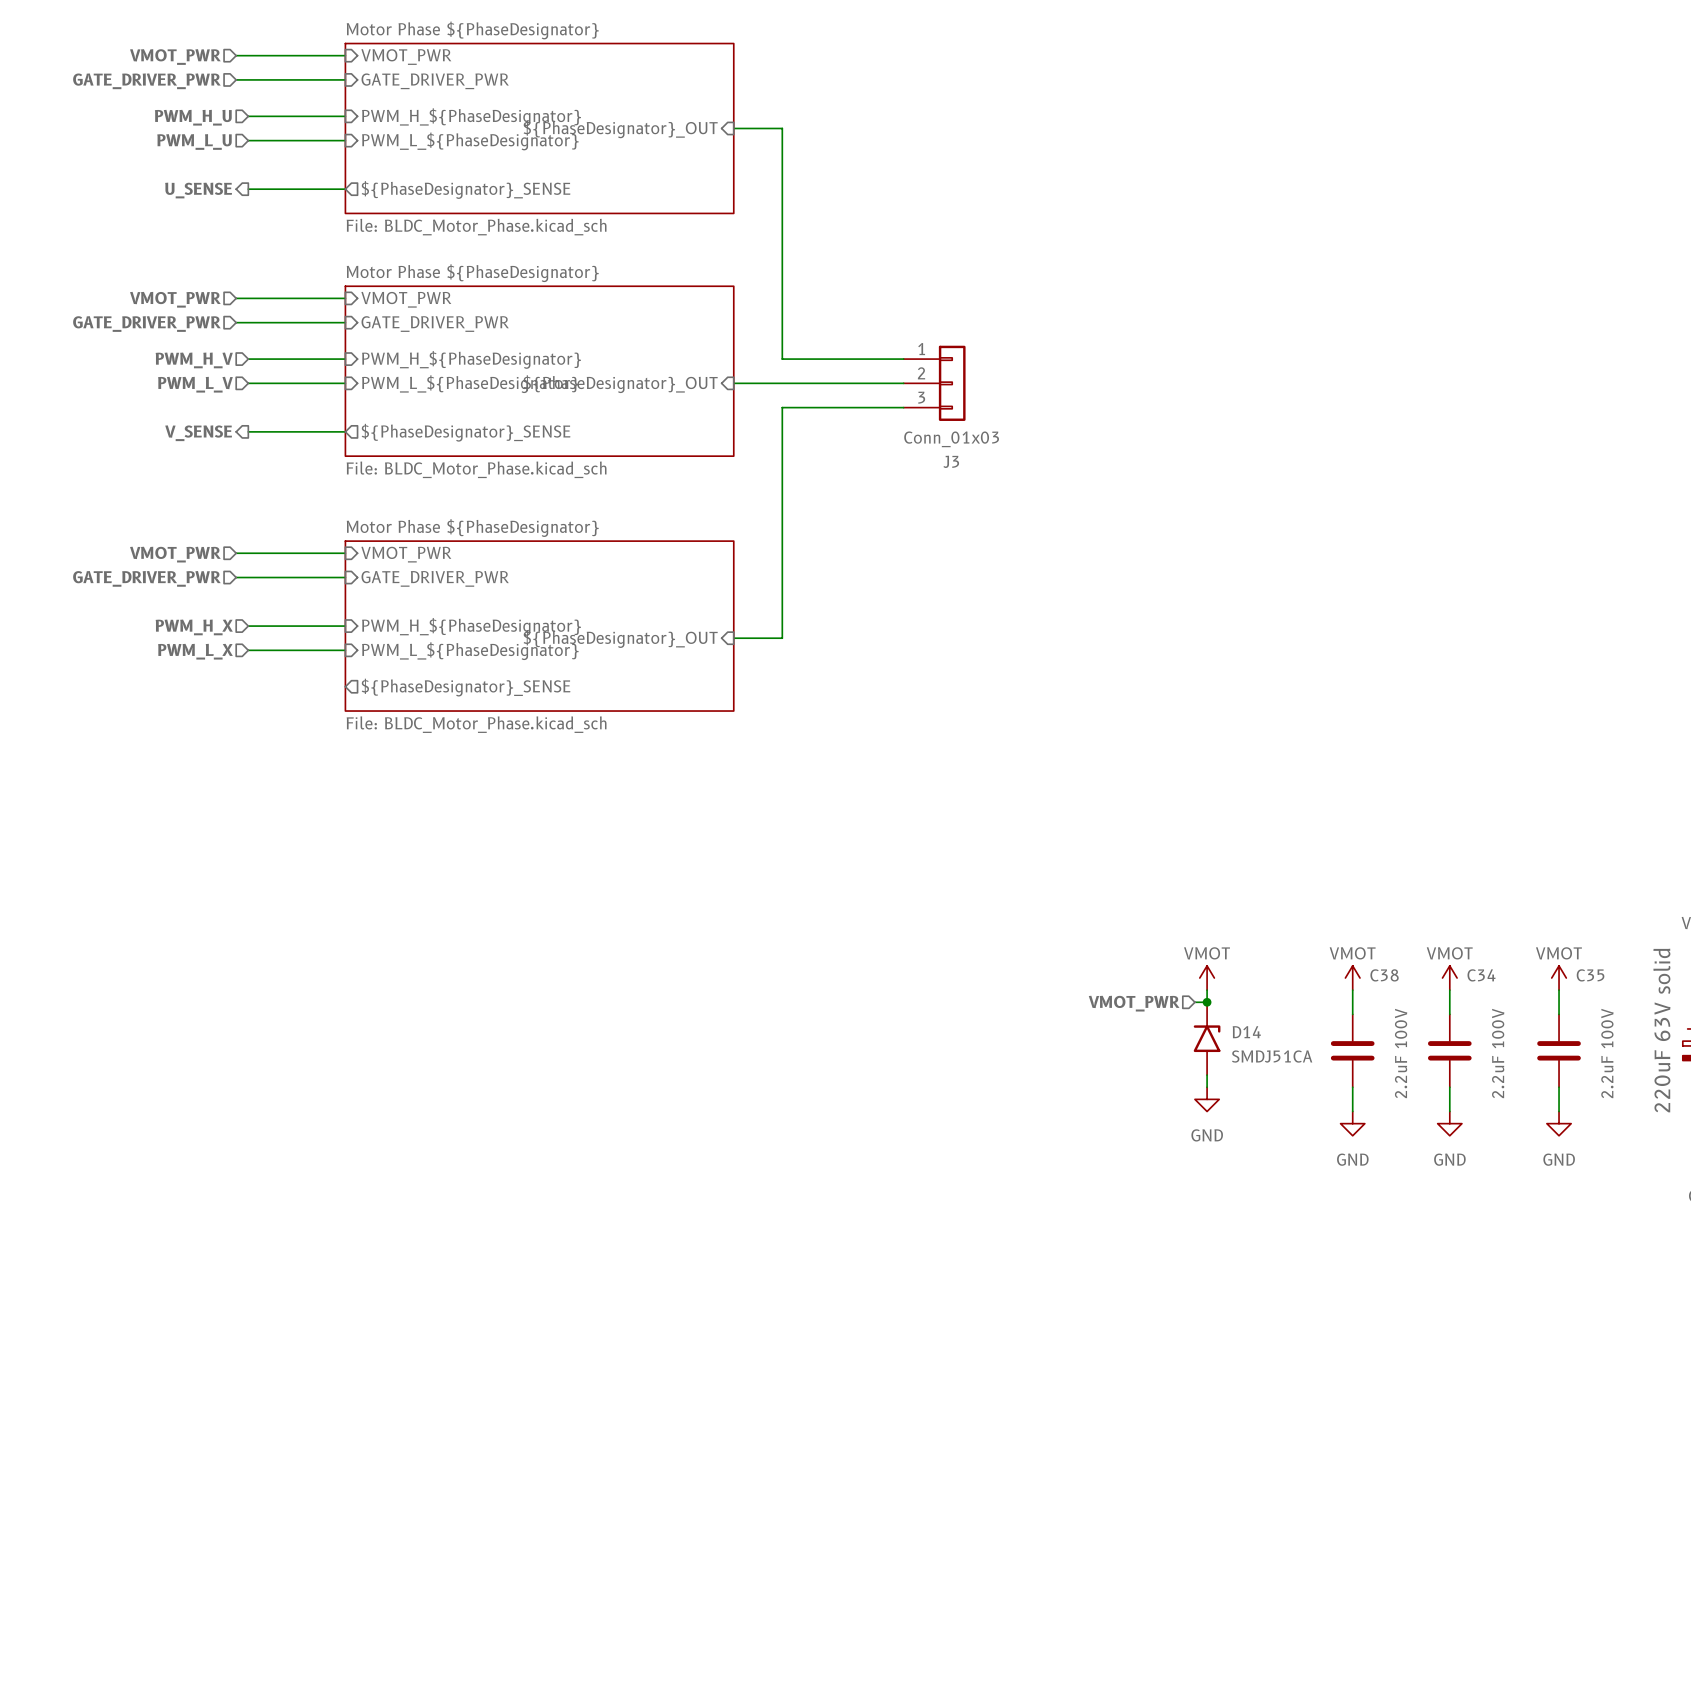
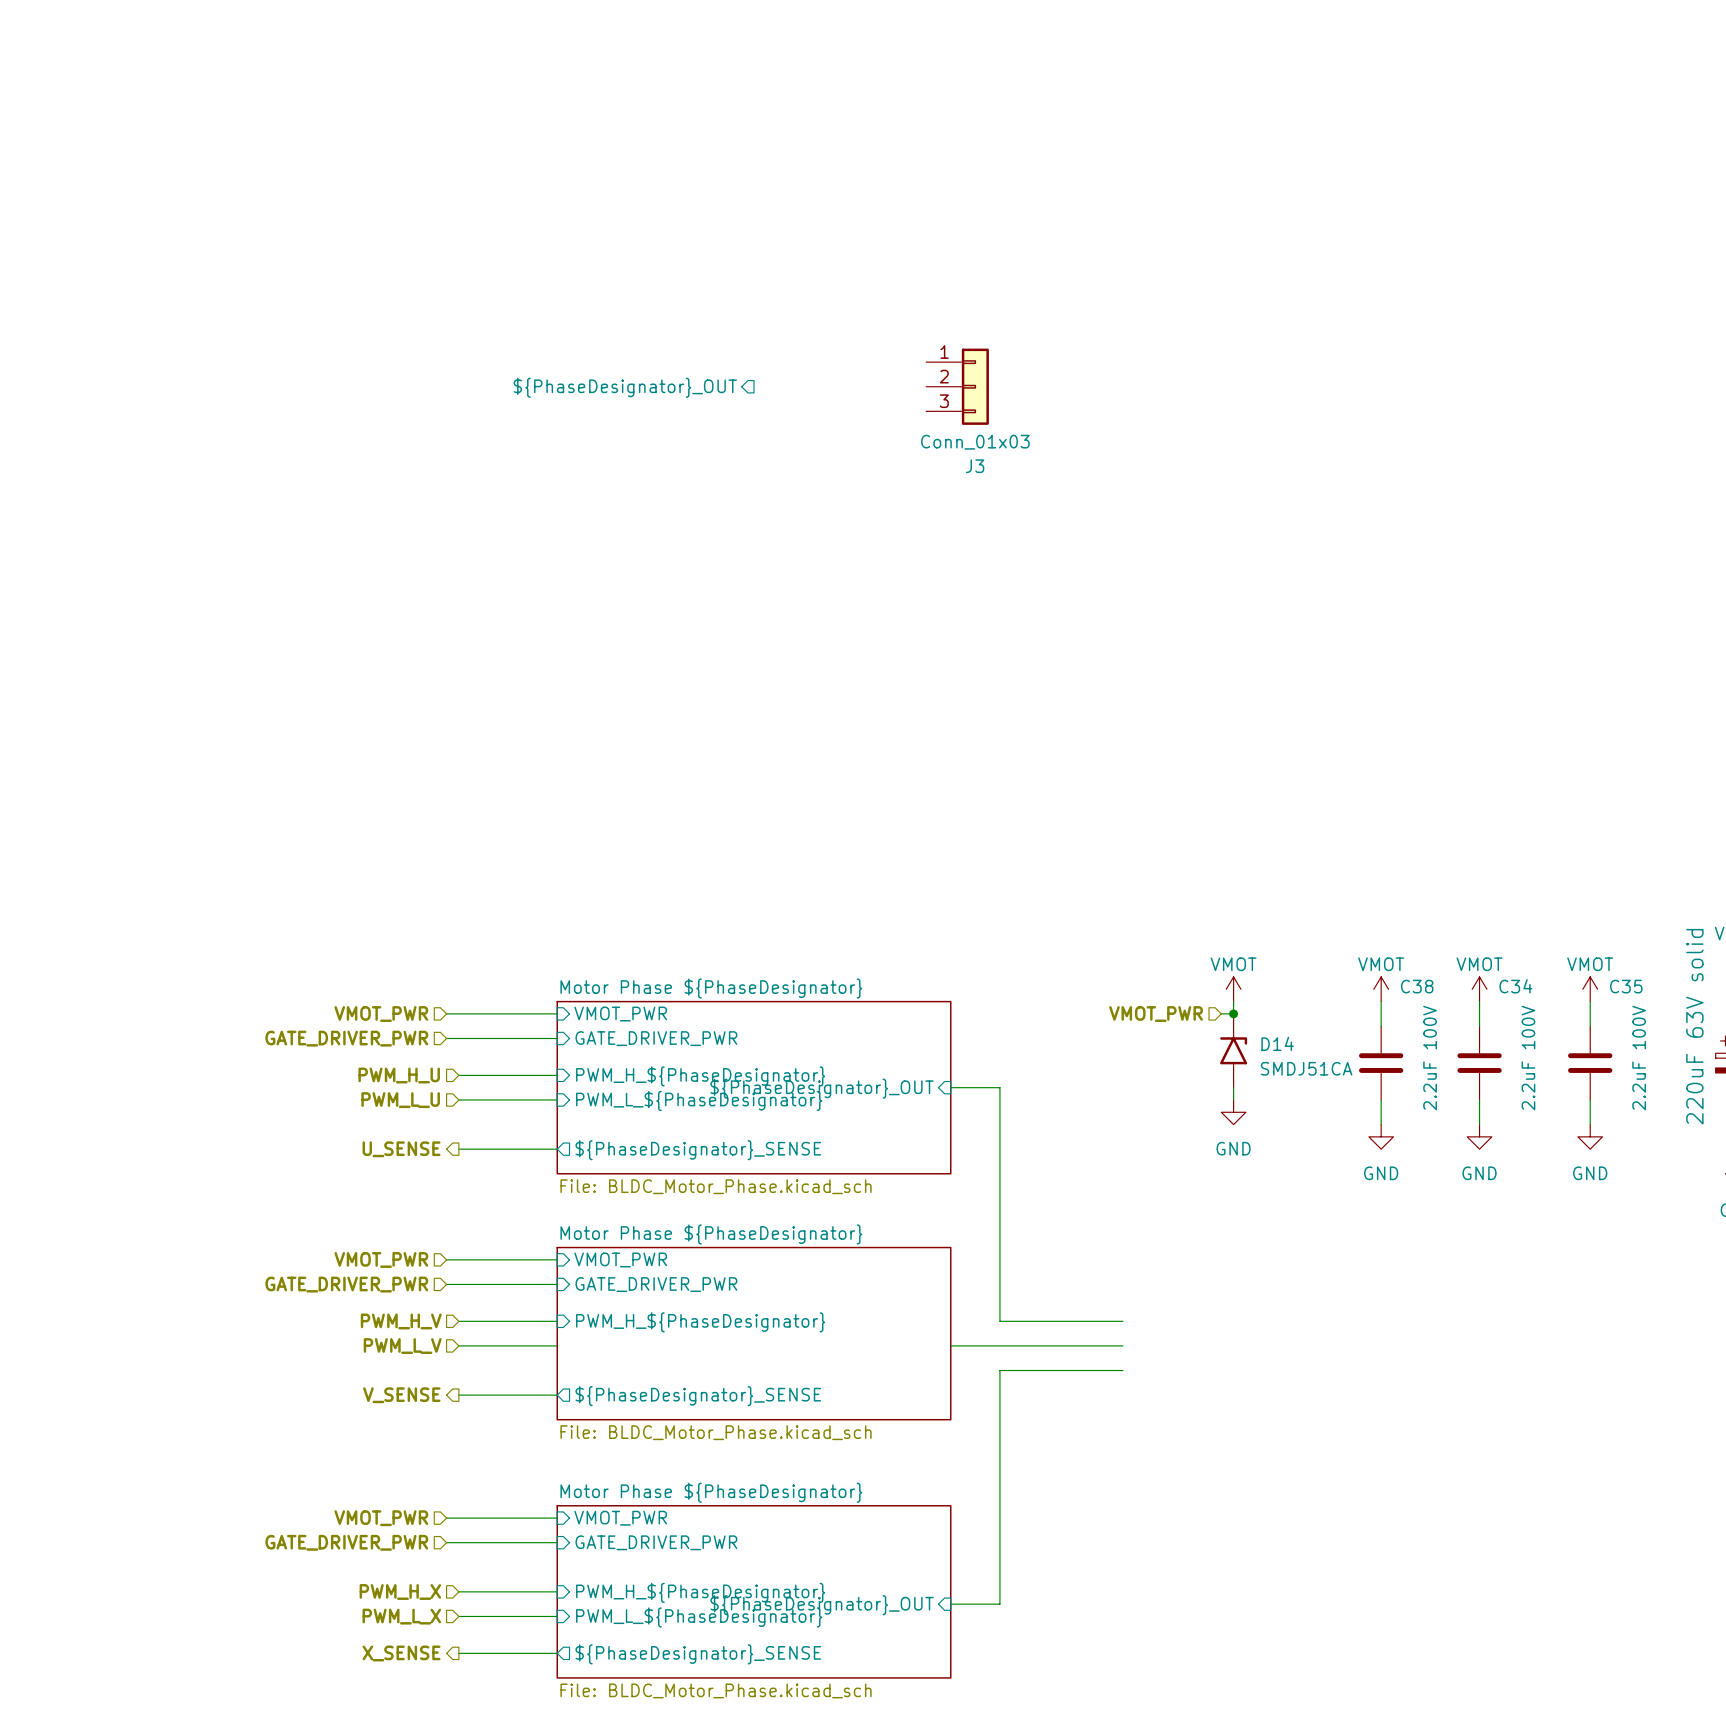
wire: (236, 55) (345, 55) -> none
hierarchical label: VMOT_PWR (175, 57) -> none
sheet pin: VMOT_PWR (406, 57) -> none
wire: (236, 79) (345, 79) -> none
hierarchical label: GATE_DRIVER_PWR (146, 81) -> none
sheet pin: GATE_DRIVER_PWR (435, 81) -> none
wire: (248, 116) (345, 116) -> none
hierarchical label: PWM_H_U (193, 117) -> none
sheet pin: PWM_H_${PhaseDesignator} (471, 117) -> none
sheet Motor Phase ${PhaseDesignator}: File: BLDC_Motor_Phase.kicad_sch (539, 128) -> none
wire: (733, 128) (782, 128) (782, 359) (903, 359) -> none
sheet pin: ${PhaseDesignator}_OUT (620, 129) -> none
wire: (248, 140) (345, 140) -> none
hierarchical label: PWM_L_U (194, 141) -> none
sheet pin: PWM_L_${PhaseDesignator} (470, 141) -> none
wire: (248, 189) (345, 189) -> none
sheet pin: ${PhaseDesignator}_SENSE (466, 189) -> none
hierarchical label: U_SENSE (198, 190) -> none
wire: (236, 298) (345, 298) -> none
hierarchical label: VMOT_PWR (175, 299) -> none
sheet pin: VMOT_PWR (406, 299) -> none
wire: (236, 322) (345, 322) -> none
hierarchical label: GATE_DRIVER_PWR (146, 324) -> none
sheet pin: GATE_DRIVER_PWR (435, 324) -> none
wire: (248, 359) (345, 359) -> none
sheet pin: PWM_H_${PhaseDesignator} (471, 359) -> none
hierarchical label: PWM_H_V (194, 360) -> none
sheet Motor Phase ${PhaseDesignator}: File: BLDC_Motor_Phase.kicad_sch (539, 371) -> none
wire: (248, 383) (345, 383) -> none
wire: (733, 383) (903, 383) -> none
hierarchical label: PWM_L_V (195, 384) -> none
sheet pin: PWM_L_${PhaseDesignator} (470, 384) -> none
wire: (903, 407) (782, 407) (782, 638) (733, 638) -> none
wire: (248, 431) (345, 431) -> none
sheet pin: ${PhaseDesignator}_SENSE (466, 432) -> none
hierarchical label: V_SENSE (198, 433) -> none
wire: (236, 553) (345, 553) -> none
hierarchical label: VMOT_PWR (175, 554) -> none
sheet pin: VMOT_PWR (406, 554) -> none
wire: (236, 577) (345, 577) -> none
hierarchical label: GATE_DRIVER_PWR (146, 578) -> none
sheet pin: GATE_DRIVER_PWR (435, 578) -> none
wire: (248, 626) (345, 626) -> none
sheet pin: PWM_H_${PhaseDesignator} (471, 626) -> none
sheet Motor Phase ${PhaseDesignator}: File: BLDC_Motor_Phase.kicad_sch (539, 626) -> none
hierarchical label: PWM_H_X (194, 627) -> none
sheet pin: ${PhaseDesignator}_OUT (620, 639) -> none
wire: (248, 650) (345, 650) -> none
hierarchical label: PWM_L_X (195, 651) -> none
sheet pin: PWM_L_${PhaseDesignator} (470, 651) -> none
sheet pin: ${PhaseDesignator}_SENSE (466, 687) -> none
wire: none -> (446, 1013) (557, 1013)
hierarchical label: none -> VMOT_PWR (381, 1014)
sheet pin: none -> VMOT_PWR (620, 1014)
wire: none -> (446, 1038) (557, 1038)
hierarchical label: none -> GATE_DRIVER_PWR (346, 1038)
sheet pin: none -> GATE_DRIVER_PWR (656, 1038)
wire: none -> (458, 1075) (557, 1075)
sheet pin: none -> PWM_H_${PhaseDesignator} (700, 1076)
hierarchical label: none -> PWM_H_U (399, 1075)
sheet Motor Phase ${PhaseDesignator}: none -> File: BLDC_Motor_Phase.kicad_sch (754, 1087)
sheet pin: none -> ${PhaseDesignator}_OUT (822, 1088)
wire: none -> (950, 1087) (999, 1087) (999, 1321) (1122, 1321)
wire: none -> (458, 1099) (557, 1099)
hierarchical label: none -> PWM_L_U (400, 1100)
sheet pin: none -> PWM_L_${PhaseDesignator} (699, 1100)
wire: none -> (458, 1149) (557, 1149)
sheet pin: none -> ${PhaseDesignator}_SENSE (698, 1150)
hierarchical label: none -> U_SENSE (401, 1149)
wire: none -> (446, 1259) (557, 1259)
hierarchical label: none -> VMOT_PWR (381, 1259)
sheet pin: none -> VMOT_PWR (620, 1259)
wire: none -> (446, 1284) (557, 1284)
hierarchical label: none -> GATE_DRIVER_PWR (346, 1284)
sheet pin: none -> GATE_DRIVER_PWR (656, 1284)
wire: none -> (458, 1321) (557, 1321)
sheet pin: none -> PWM_H_${PhaseDesignator} (700, 1322)
hierarchical label: none -> PWM_H_V (401, 1321)
sheet Motor Phase ${PhaseDesignator}: none -> File: BLDC_Motor_Phase.kicad_sch (754, 1333)
wire: none -> (458, 1345) (557, 1345)
wire: none -> (950, 1345) (1122, 1345)
hierarchical label: none -> PWM_L_V (402, 1346)
wire: none -> (1122, 1370) (999, 1370) (999, 1604) (950, 1604)
wire: none -> (458, 1395) (557, 1395)
hierarchical label: none -> V_SENSE (401, 1395)
sheet pin: none -> ${PhaseDesignator}_SENSE (698, 1396)
wire: none -> (446, 1518) (557, 1518)
hierarchical label: none -> VMOT_PWR (381, 1518)
sheet pin: none -> VMOT_PWR (620, 1518)
wire: none -> (446, 1542) (557, 1542)
hierarchical label: none -> GATE_DRIVER_PWR (346, 1542)
sheet pin: none -> GATE_DRIVER_PWR (656, 1542)
wire: none -> (458, 1591) (557, 1591)
sheet Motor Phase ${PhaseDesignator}: none -> File: BLDC_Motor_Phase.kicad_sch (754, 1591)
sheet pin: none -> PWM_H_${PhaseDesignator} (700, 1592)
hierarchical label: none -> PWM_H_X (400, 1591)
sheet pin: none -> ${PhaseDesignator}_OUT (822, 1605)
wire: none -> (458, 1616) (557, 1616)
sheet pin: none -> PWM_L_${PhaseDesignator} (699, 1617)
hierarchical label: none -> PWM_L_X (401, 1616)
wire: none -> (458, 1653) (557, 1653)
hierarchical label: none -> X_SENSE (401, 1653)
sheet pin: none -> ${PhaseDesignator}_SENSE (698, 1654)

